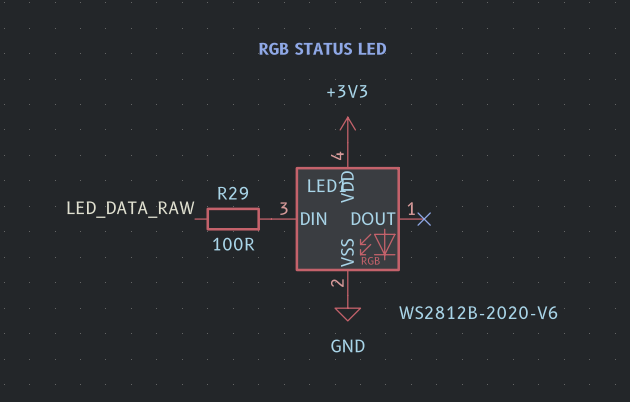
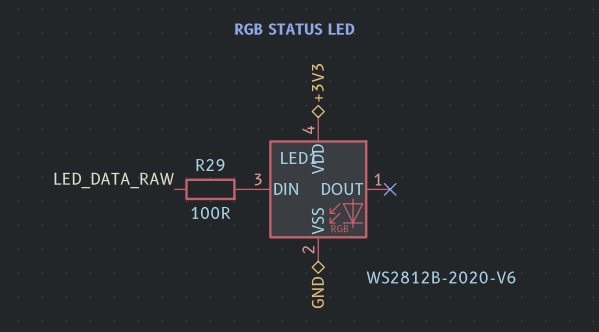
hierarchical label: none -> +3V3 (317, 82)
power symbol: +3V3 (347, 129) -> none
power symbol: GND (347, 308) -> none
hierarchical label: none -> GND (317, 292)

